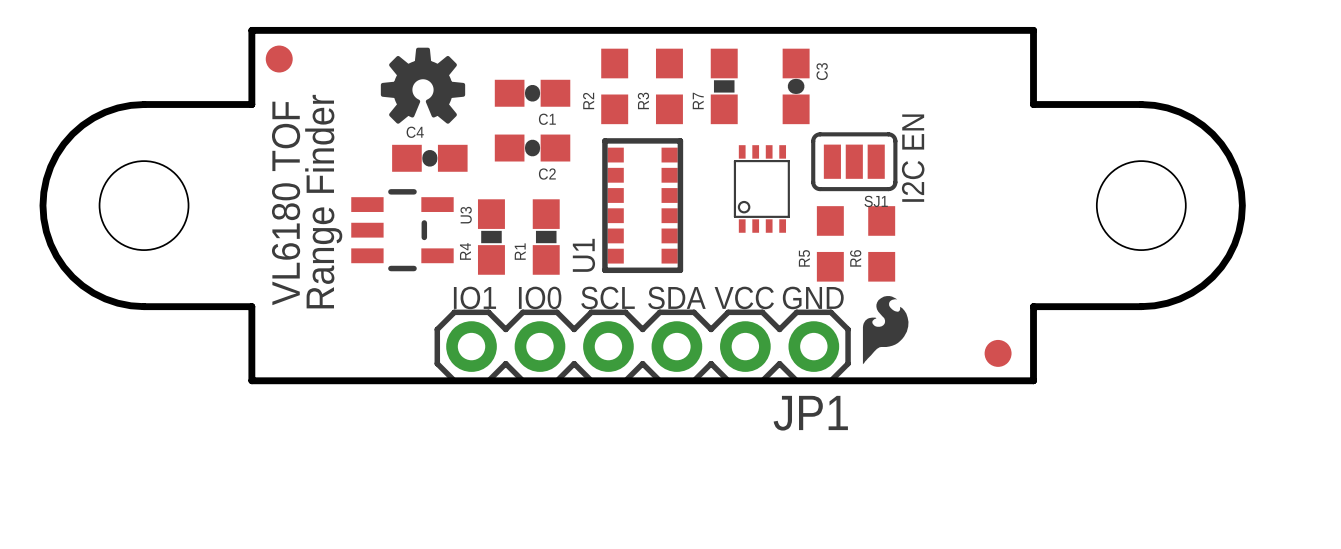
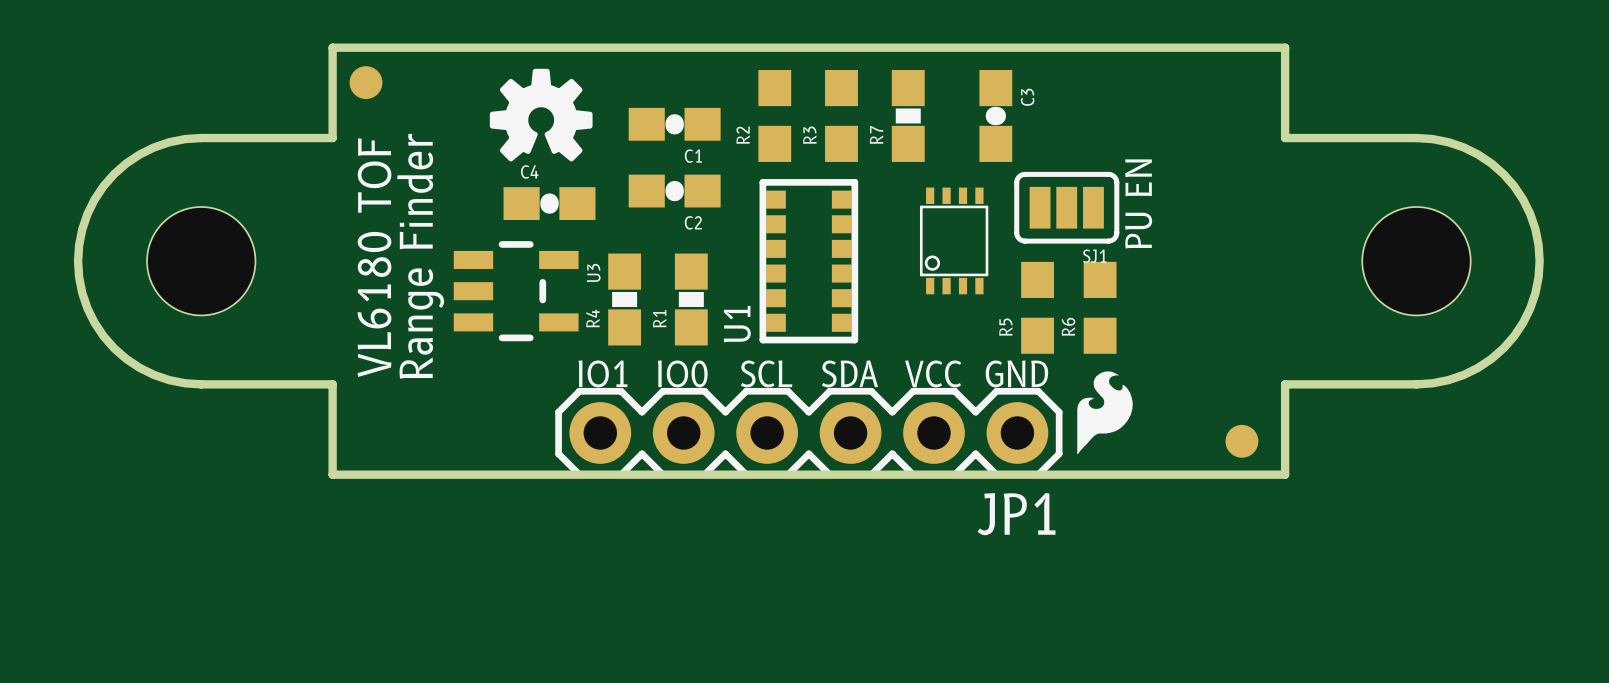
text: I2C EN (913, 158) -> PU EN (1138, 203)

